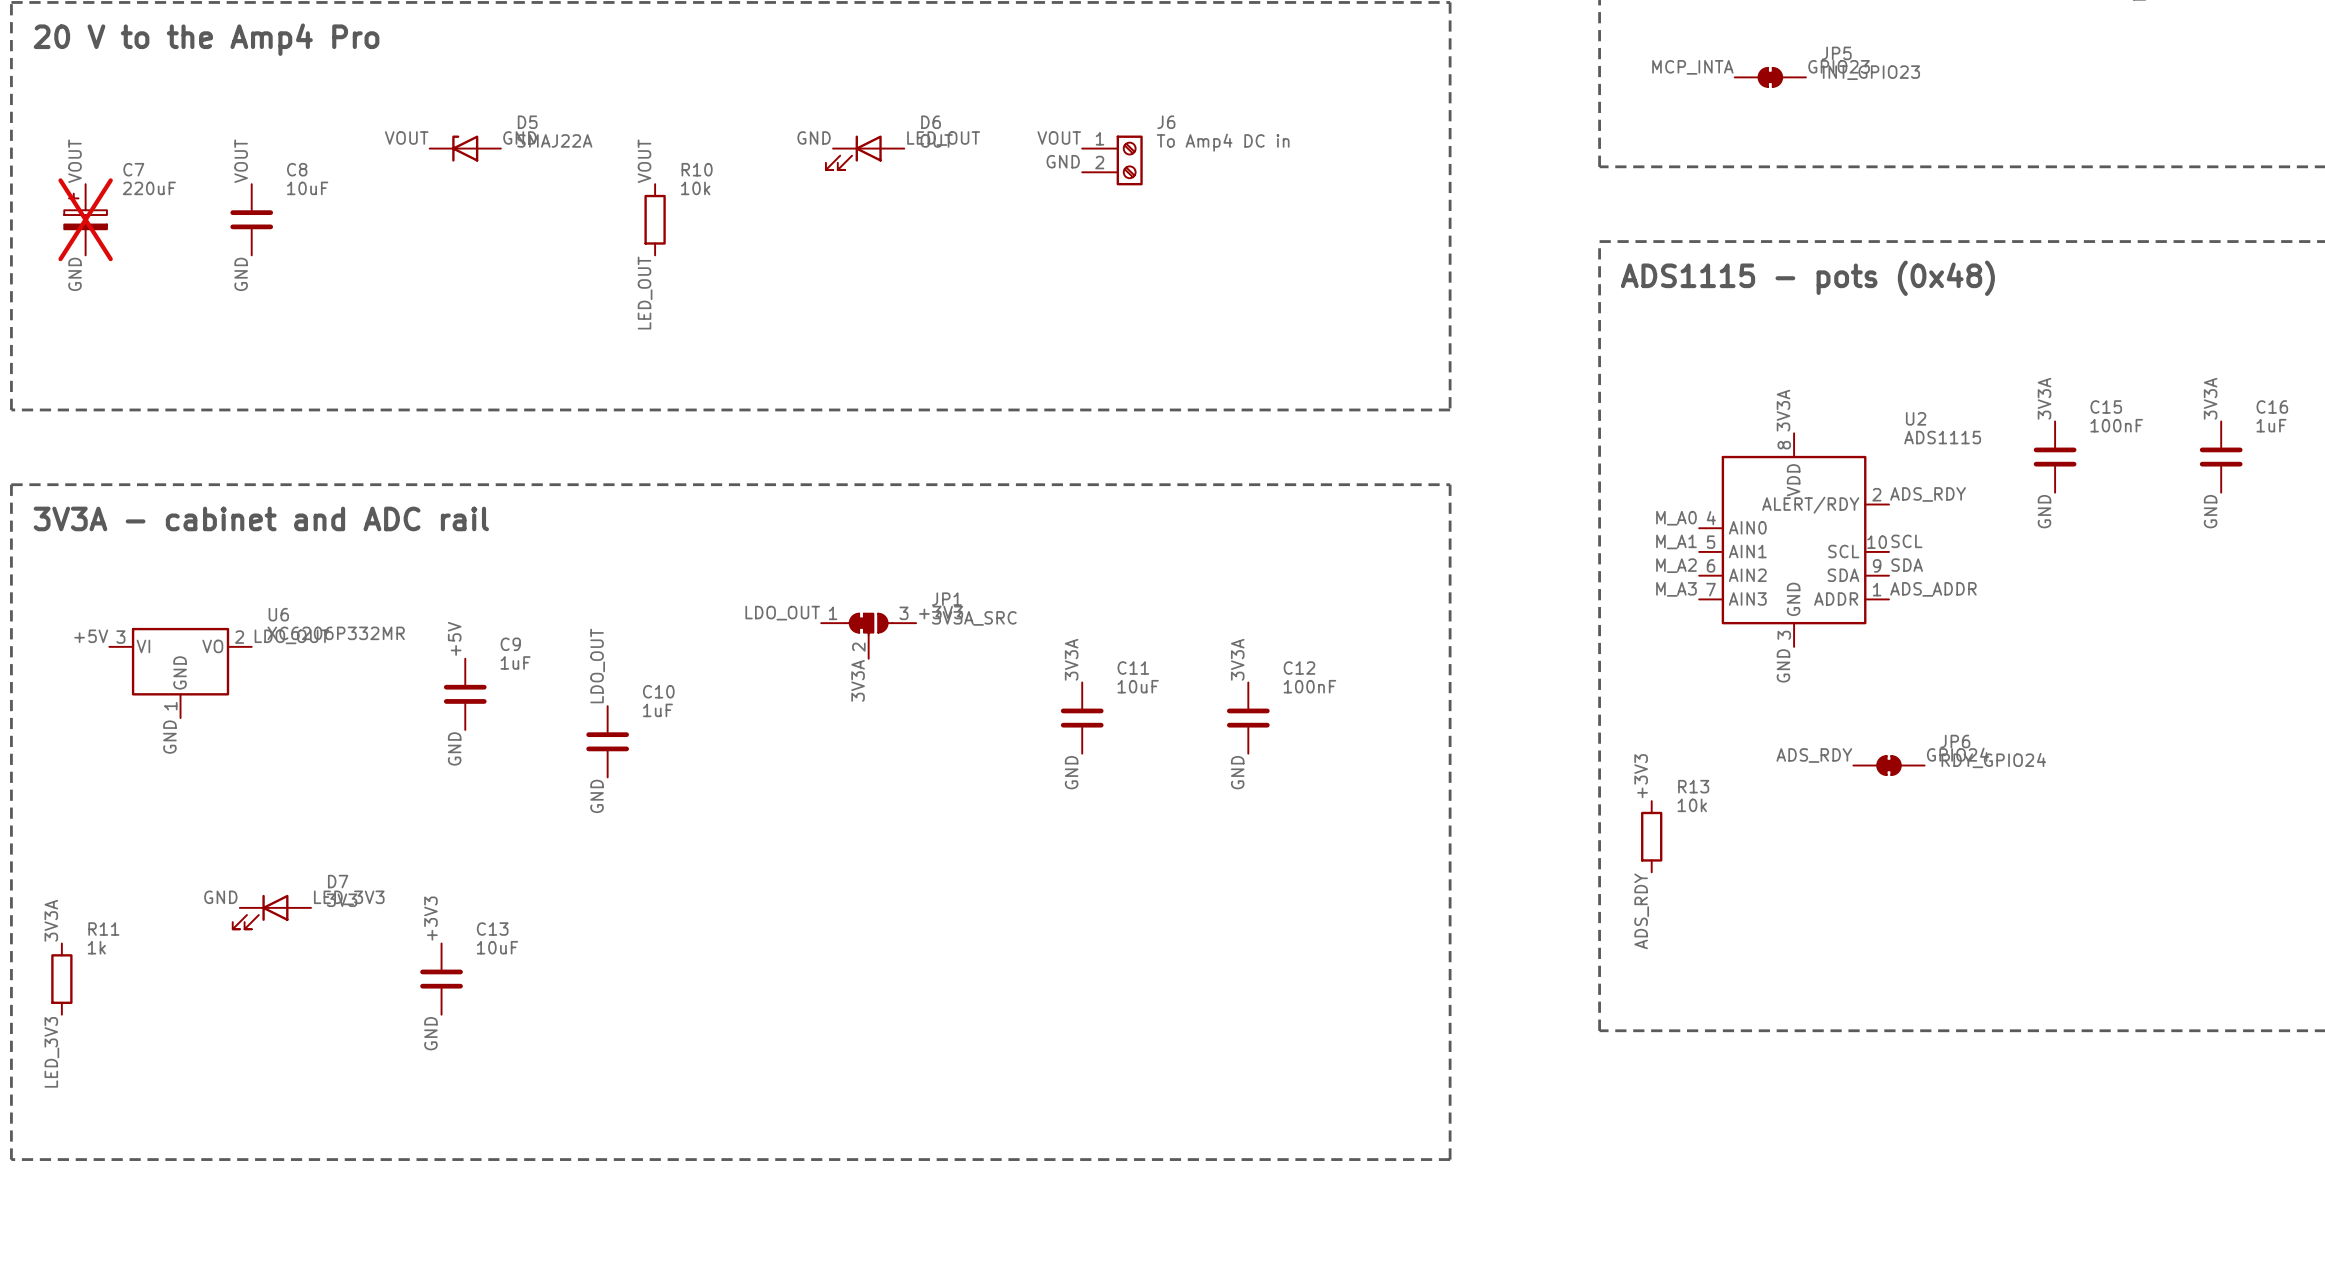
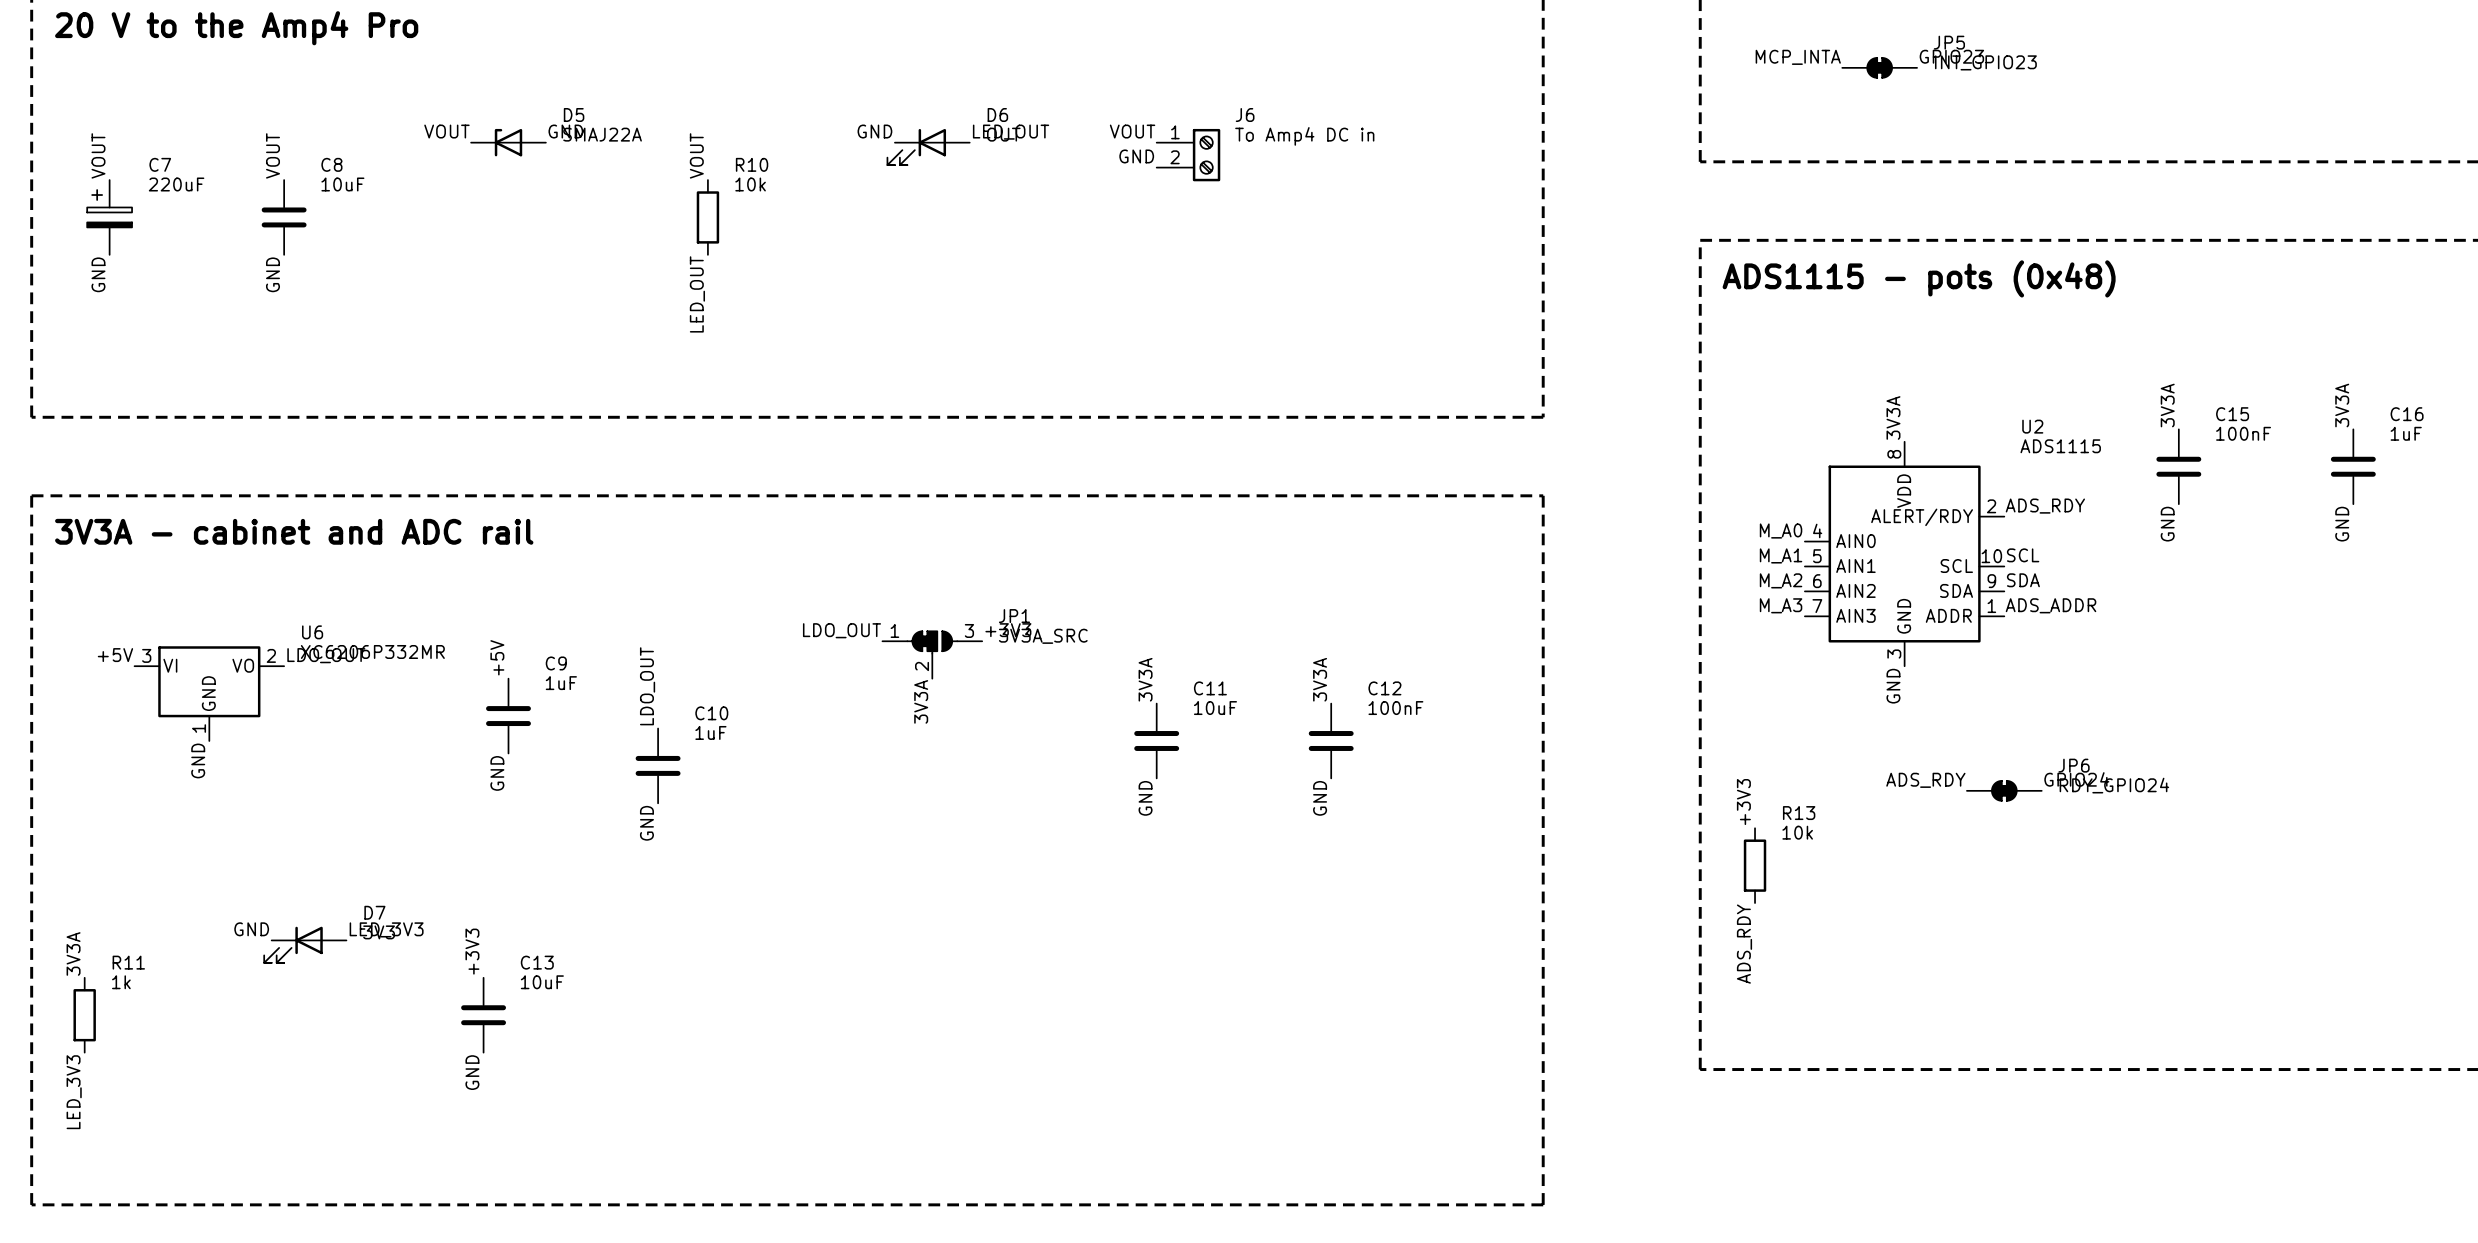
C7 do-not-place cross: (85, 219) -> none

